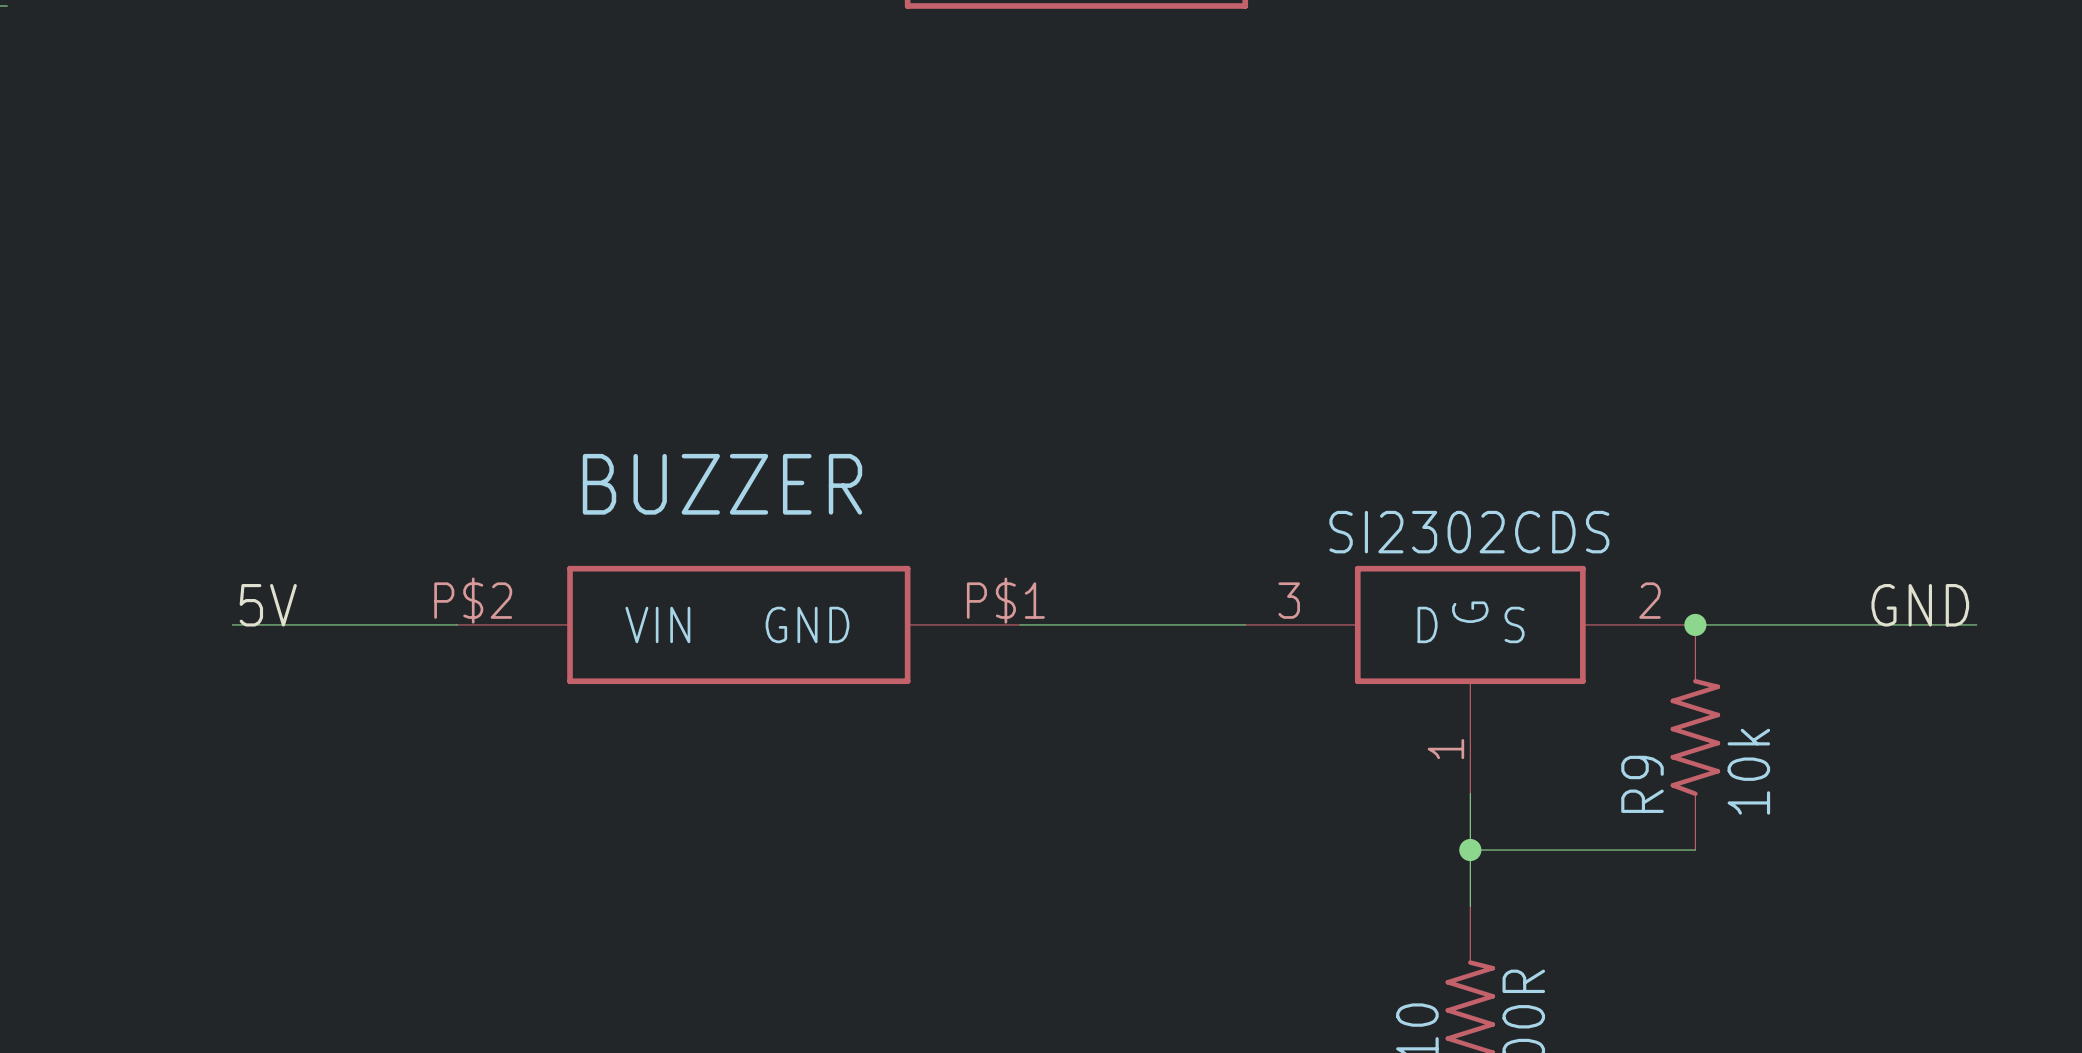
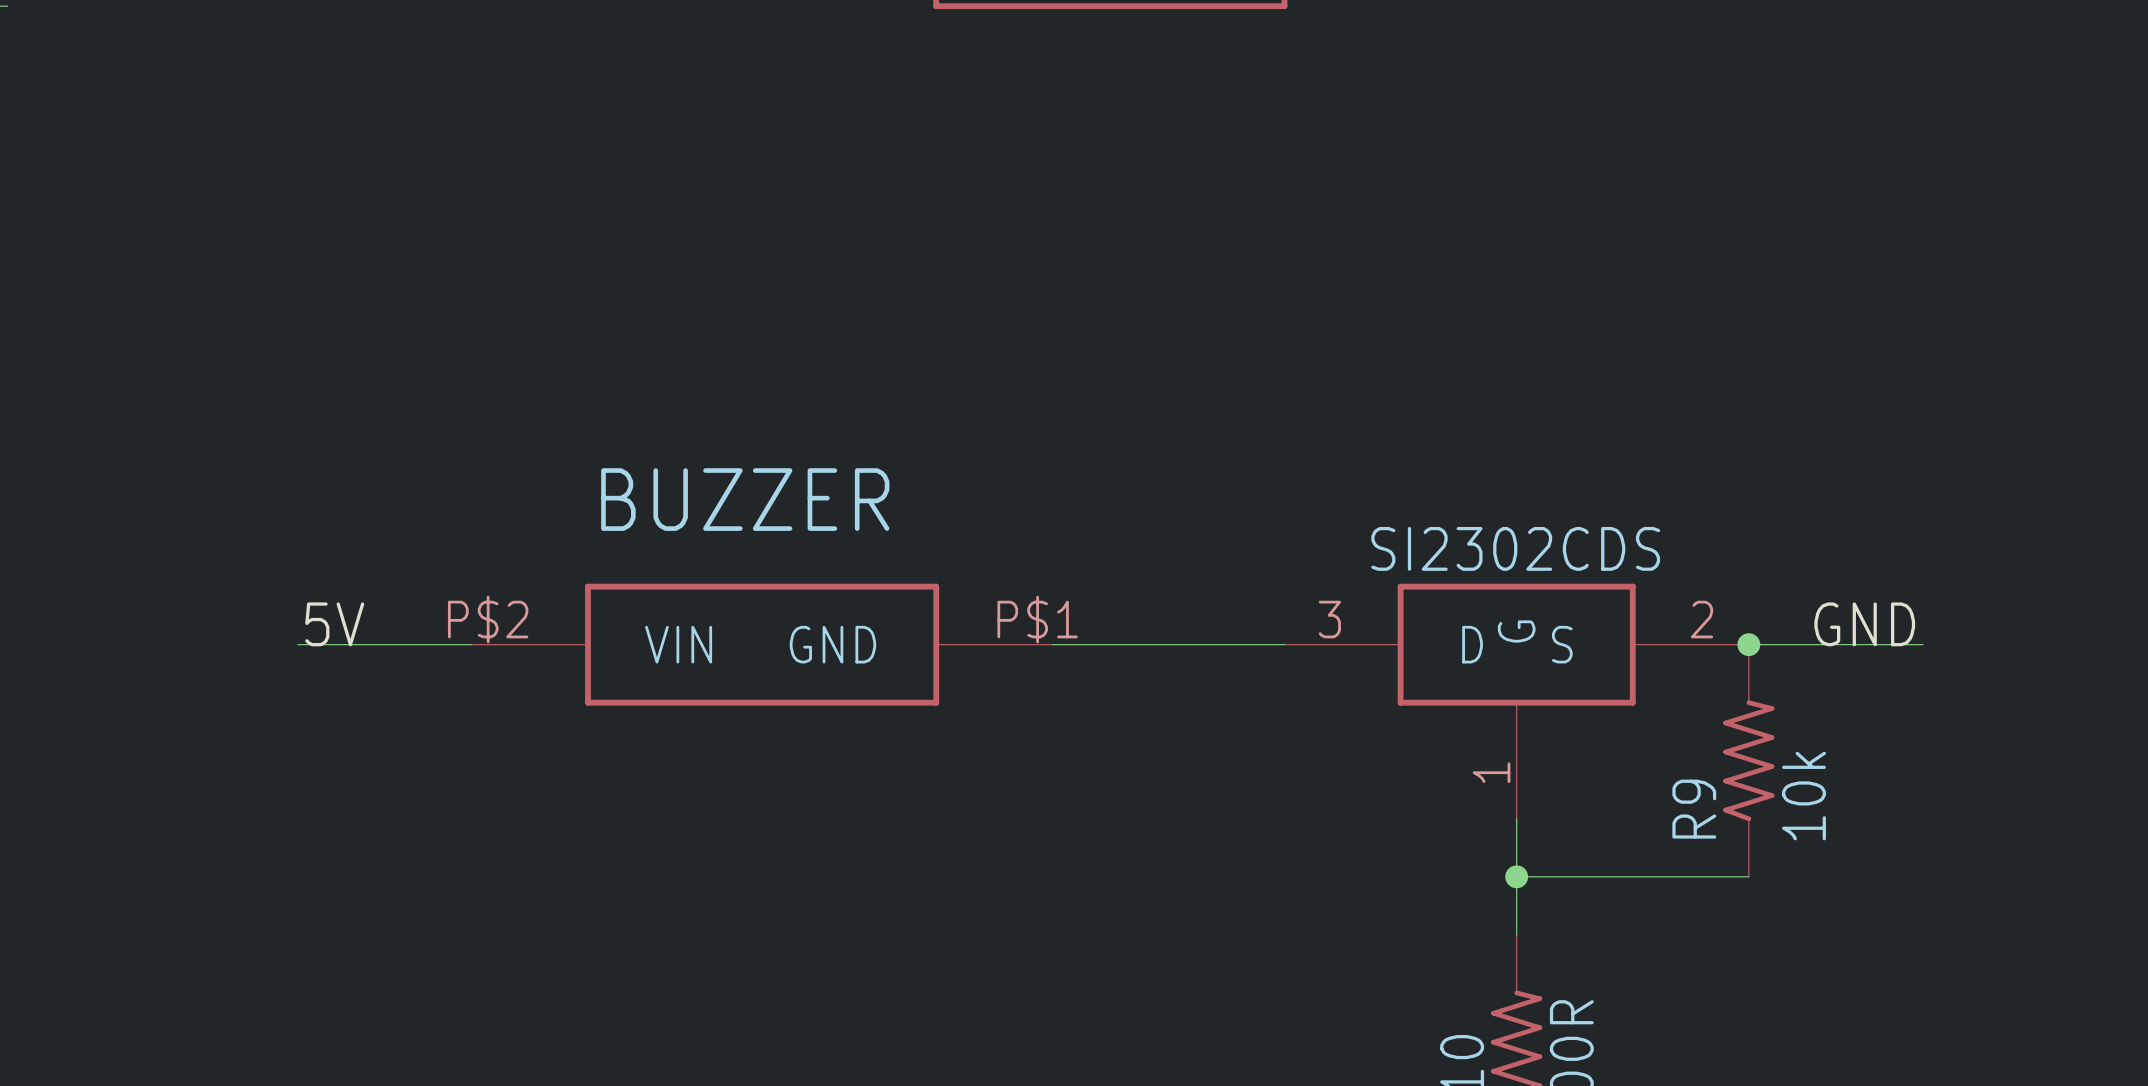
label position: 5V (268, 605) -> 5V (334, 624)
label position: GND (1920, 605) -> GND (1864, 624)
wire: (232, 624) (288, 624) -> none
wire: (1864, 624) (1976, 624) -> none

